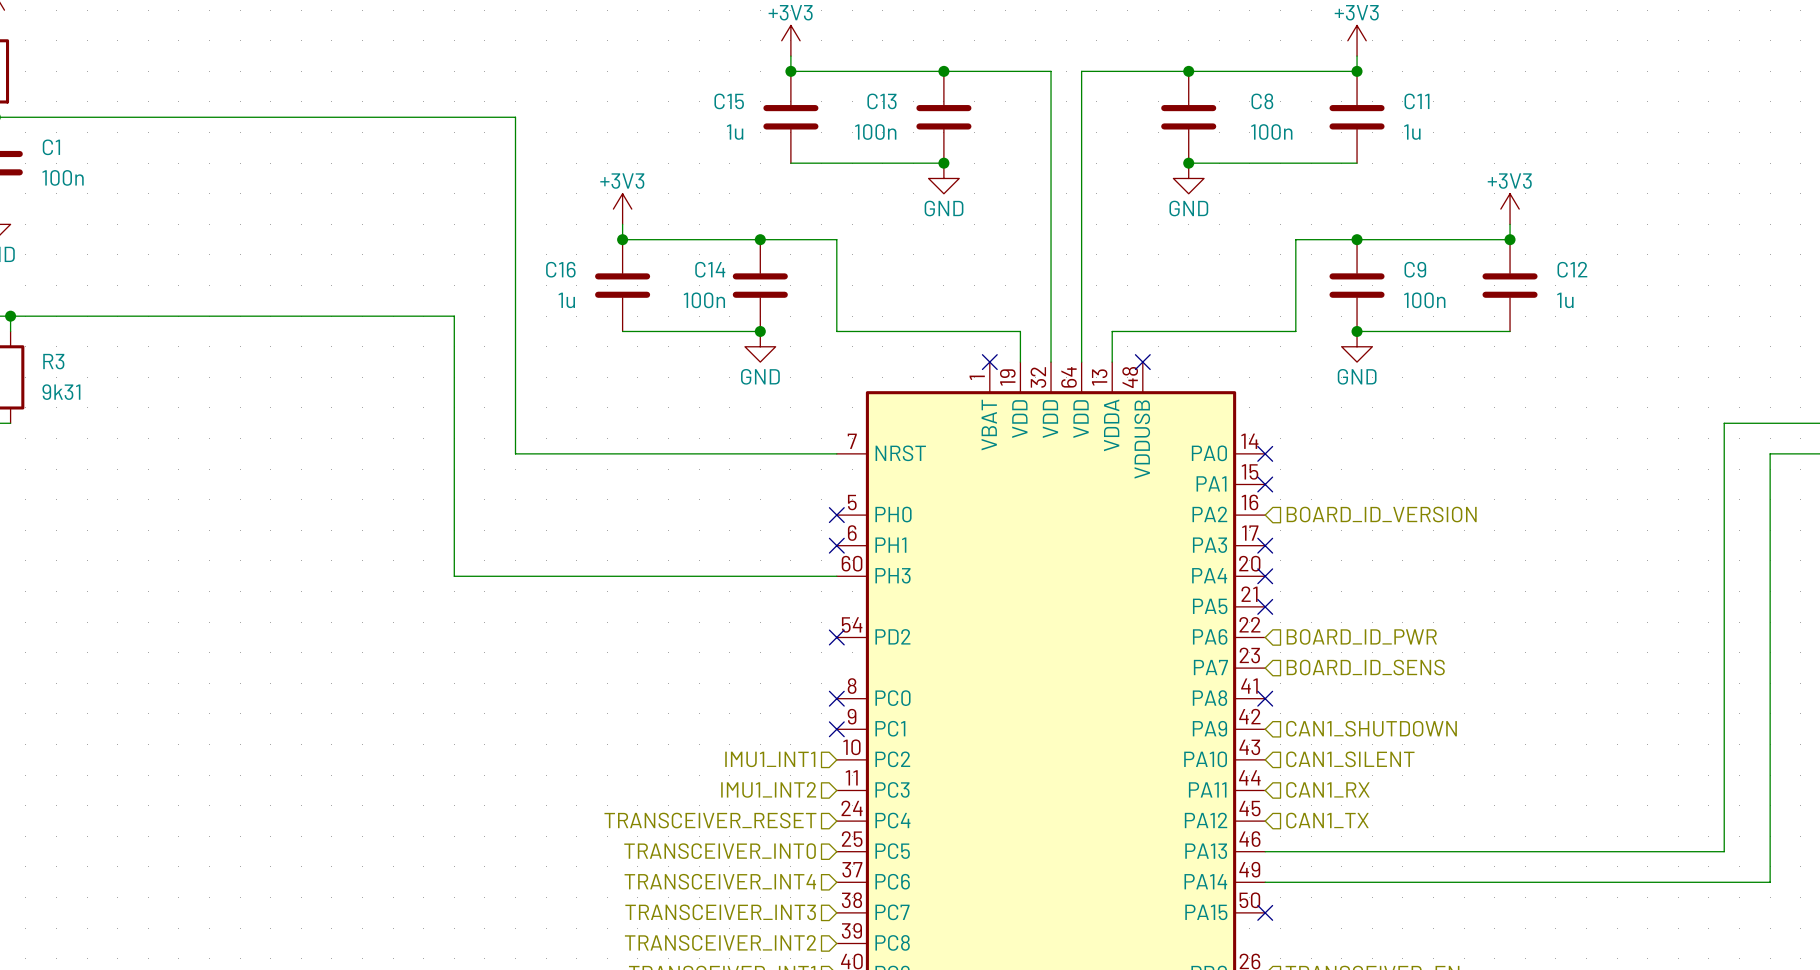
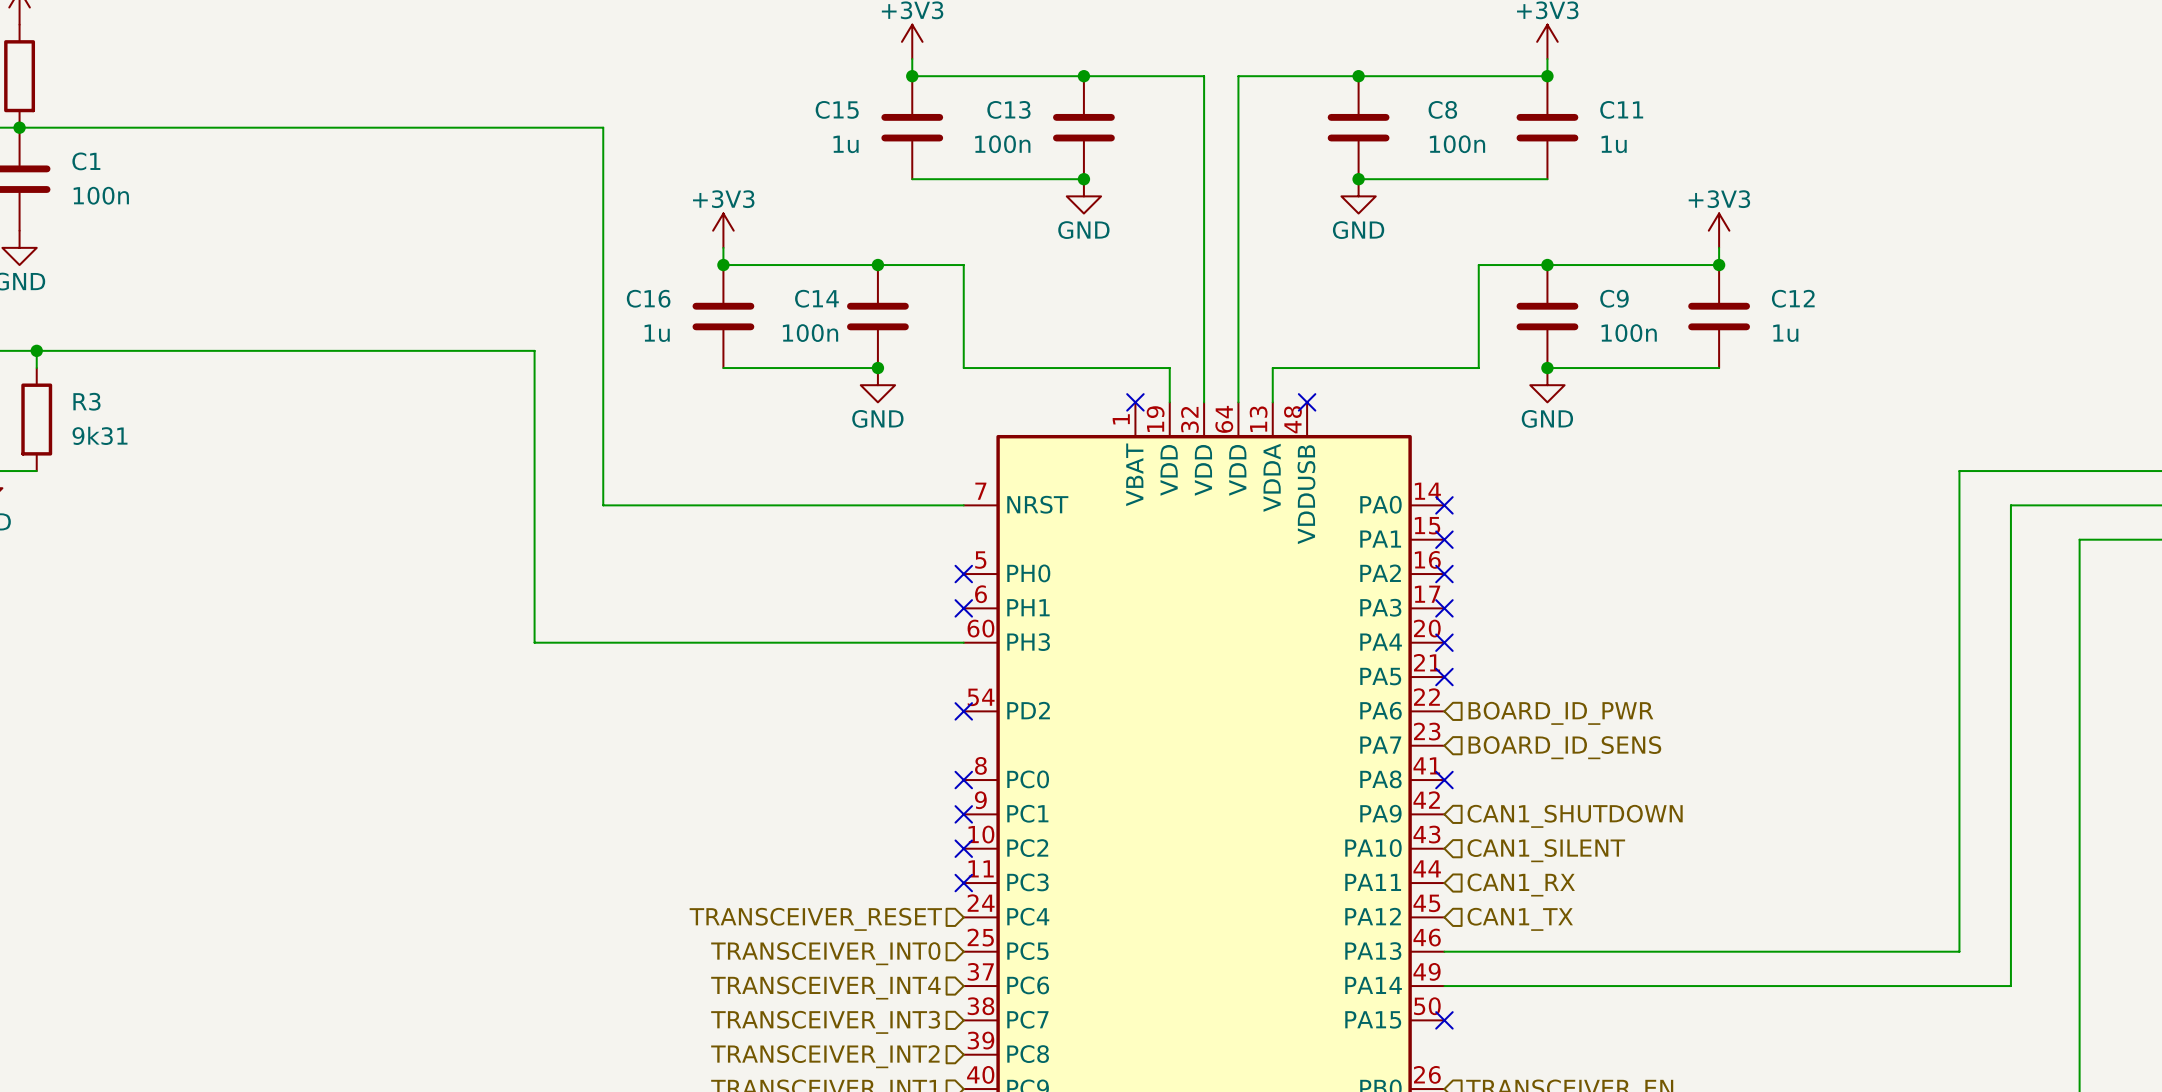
hierarchical label: BOARD_ID_VERSION (1381, 514) -> none
no-connect mark: none -> (1444, 574)
hierarchical label: IMU1_INT1 (770, 759) -> none
no-connect mark: none -> (963, 848)
hierarchical label: IMU1_INT2 (768, 789) -> none
no-connect mark: none -> (963, 883)

